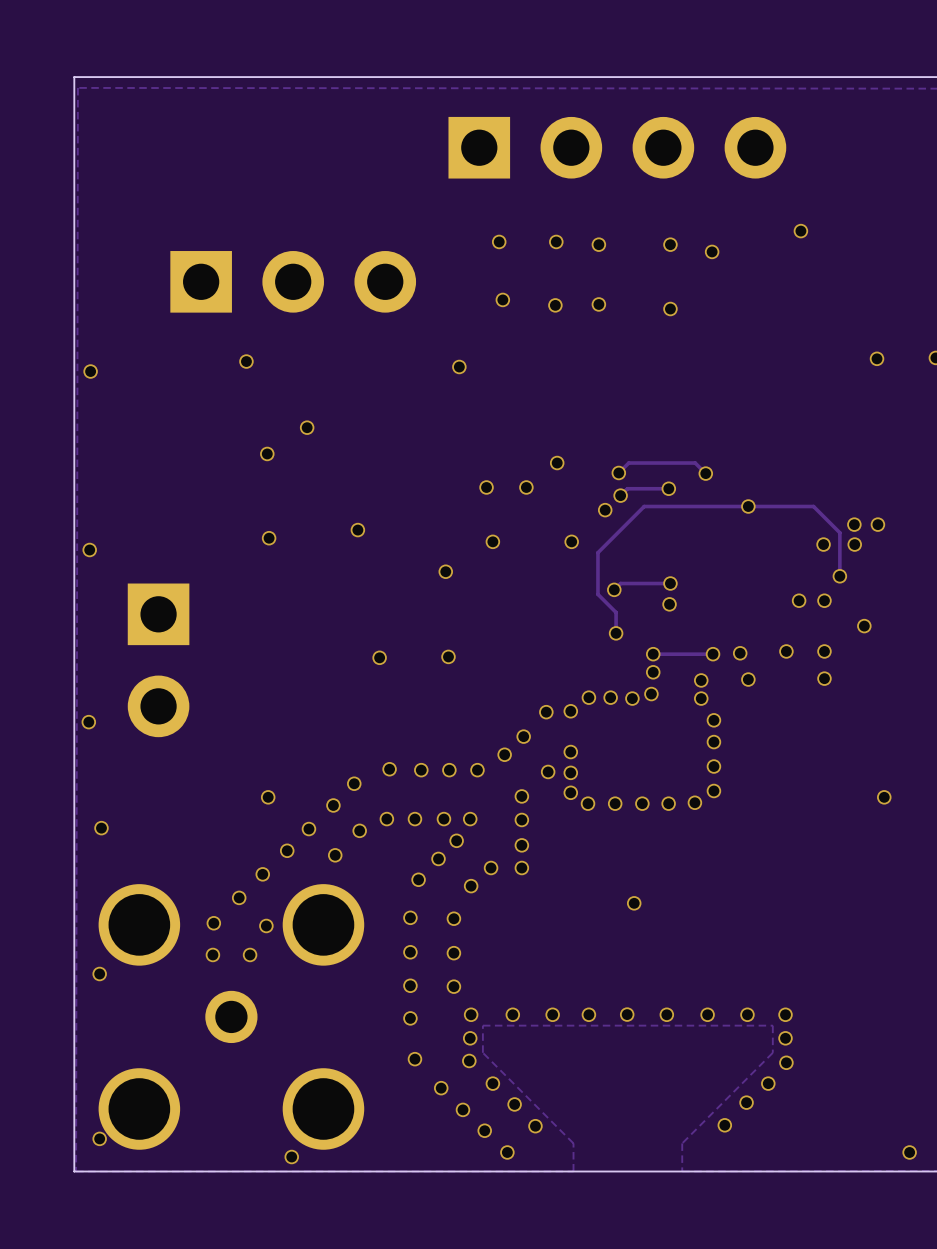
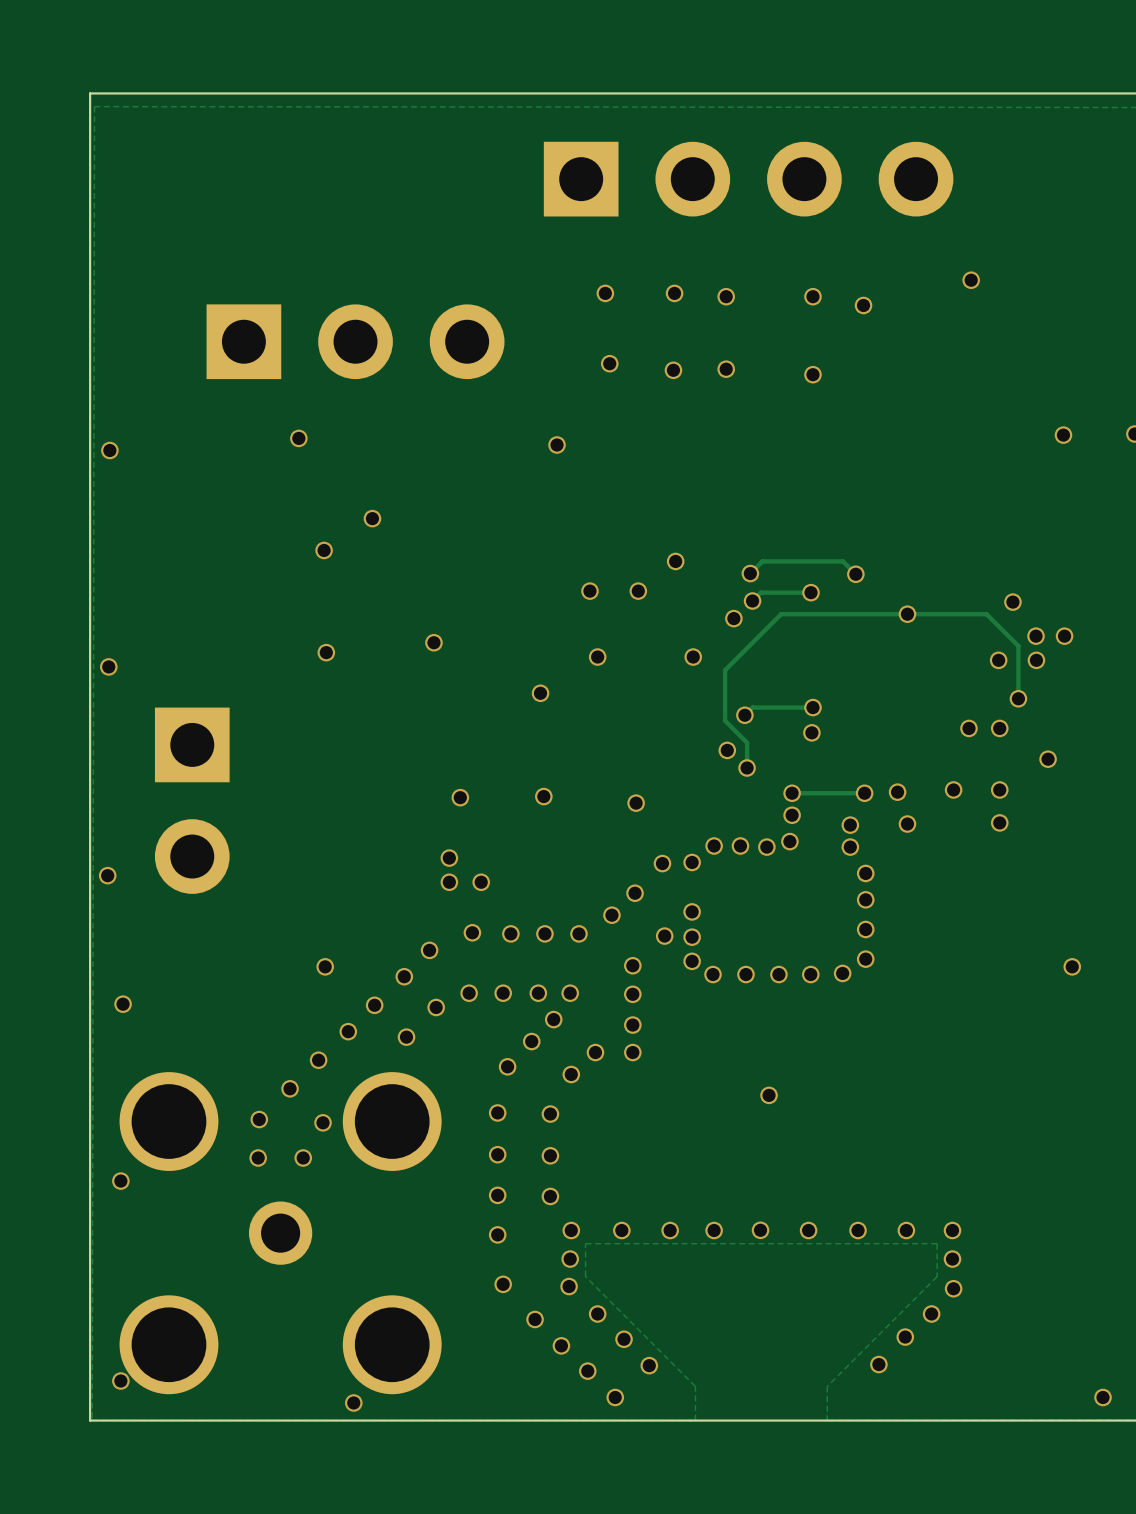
via: none -> (1012, 602)
via: none -> (727, 750)
via: none -> (636, 803)
via: none -> (449, 858)
via: none -> (449, 882)
via: none -> (481, 882)

